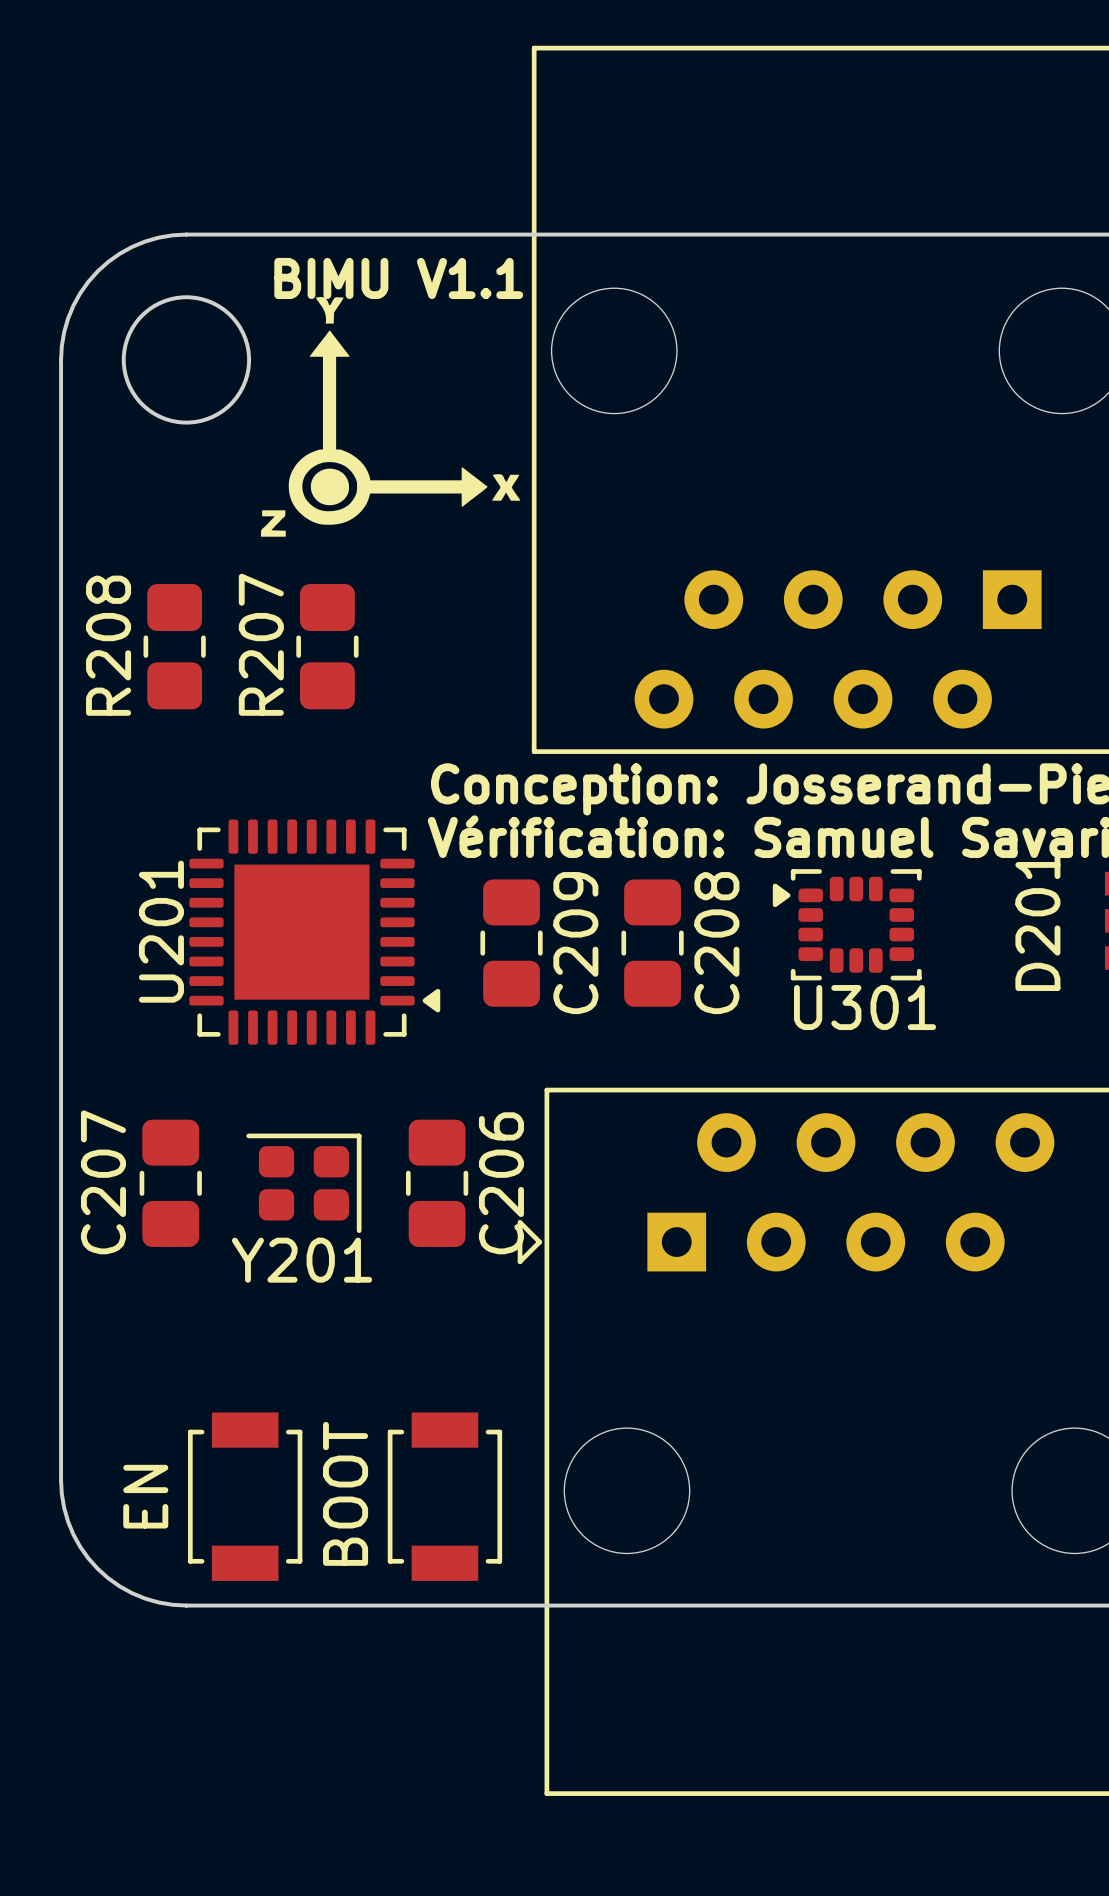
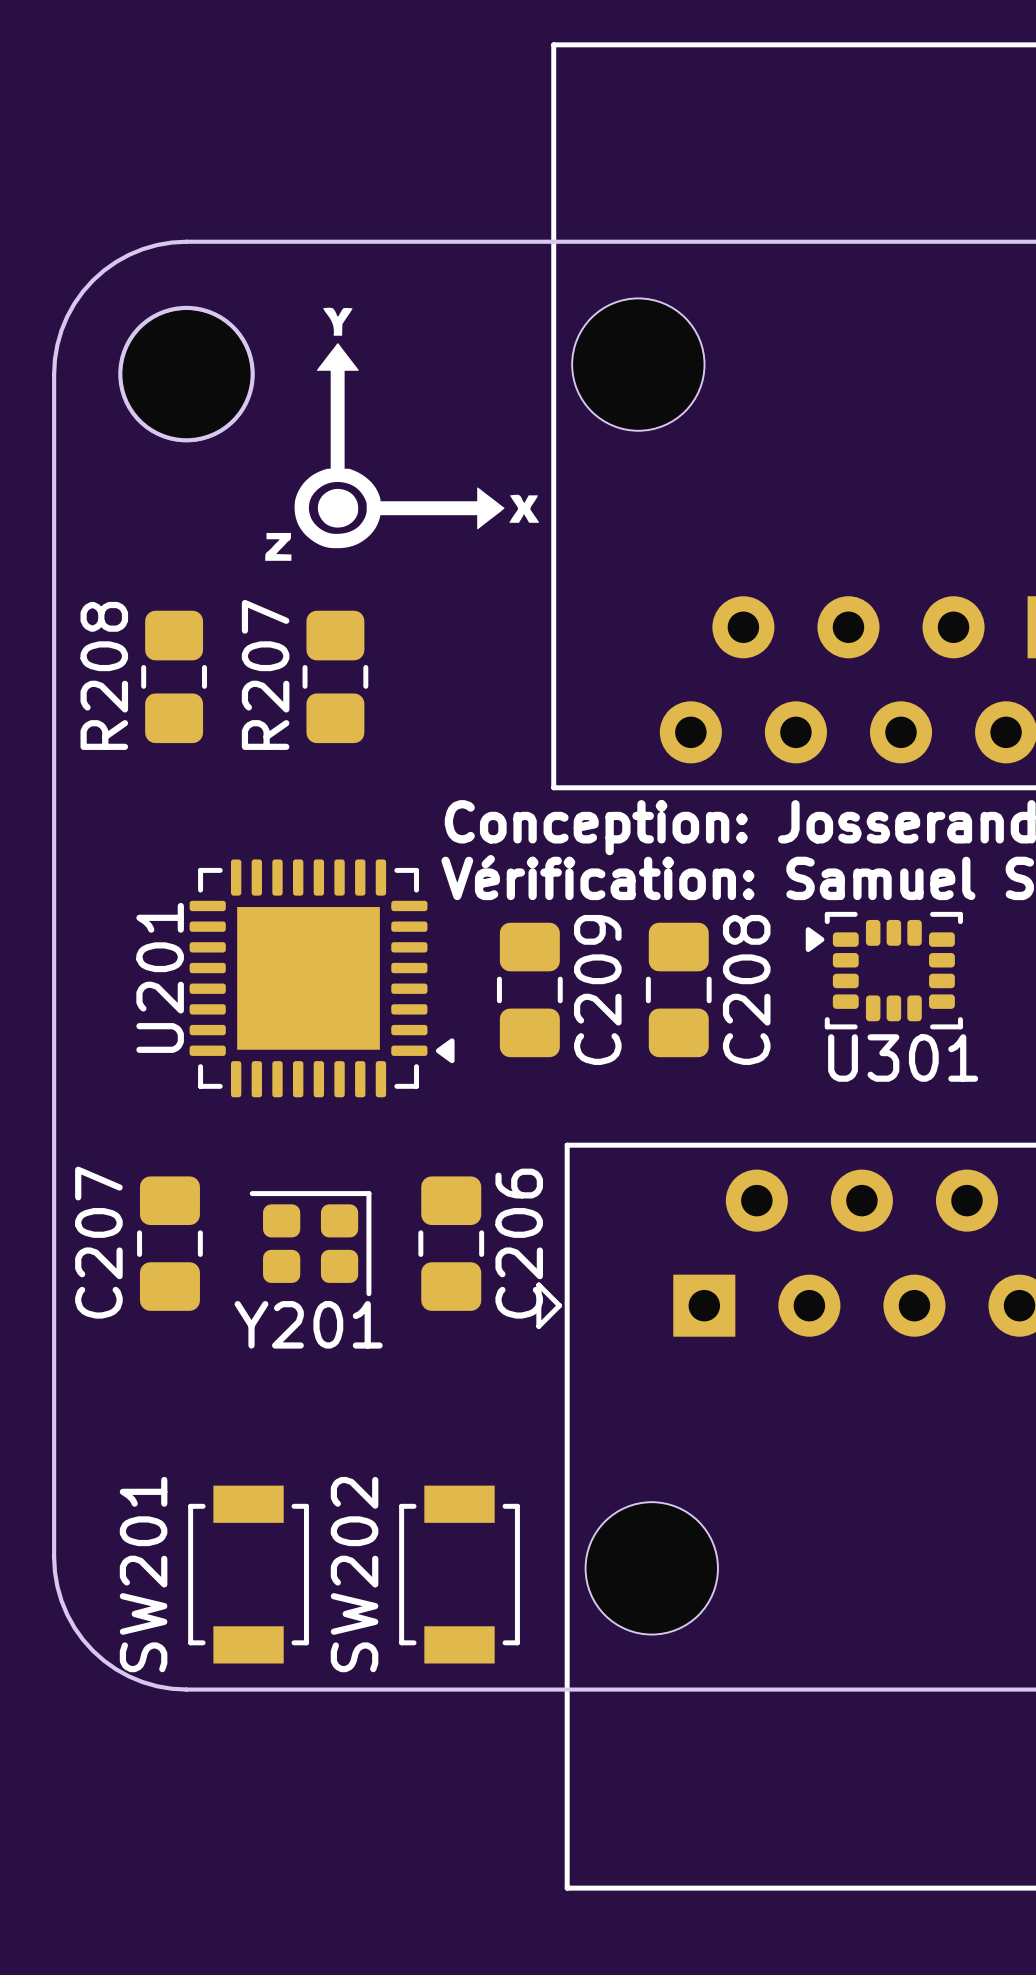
text: BIMU V1.1 (398, 278) -> none
BOOT name: BOOT (345, 1493) -> SW202 (354, 1574)
EN name: EN (145, 1496) -> SW201 (143, 1574)

